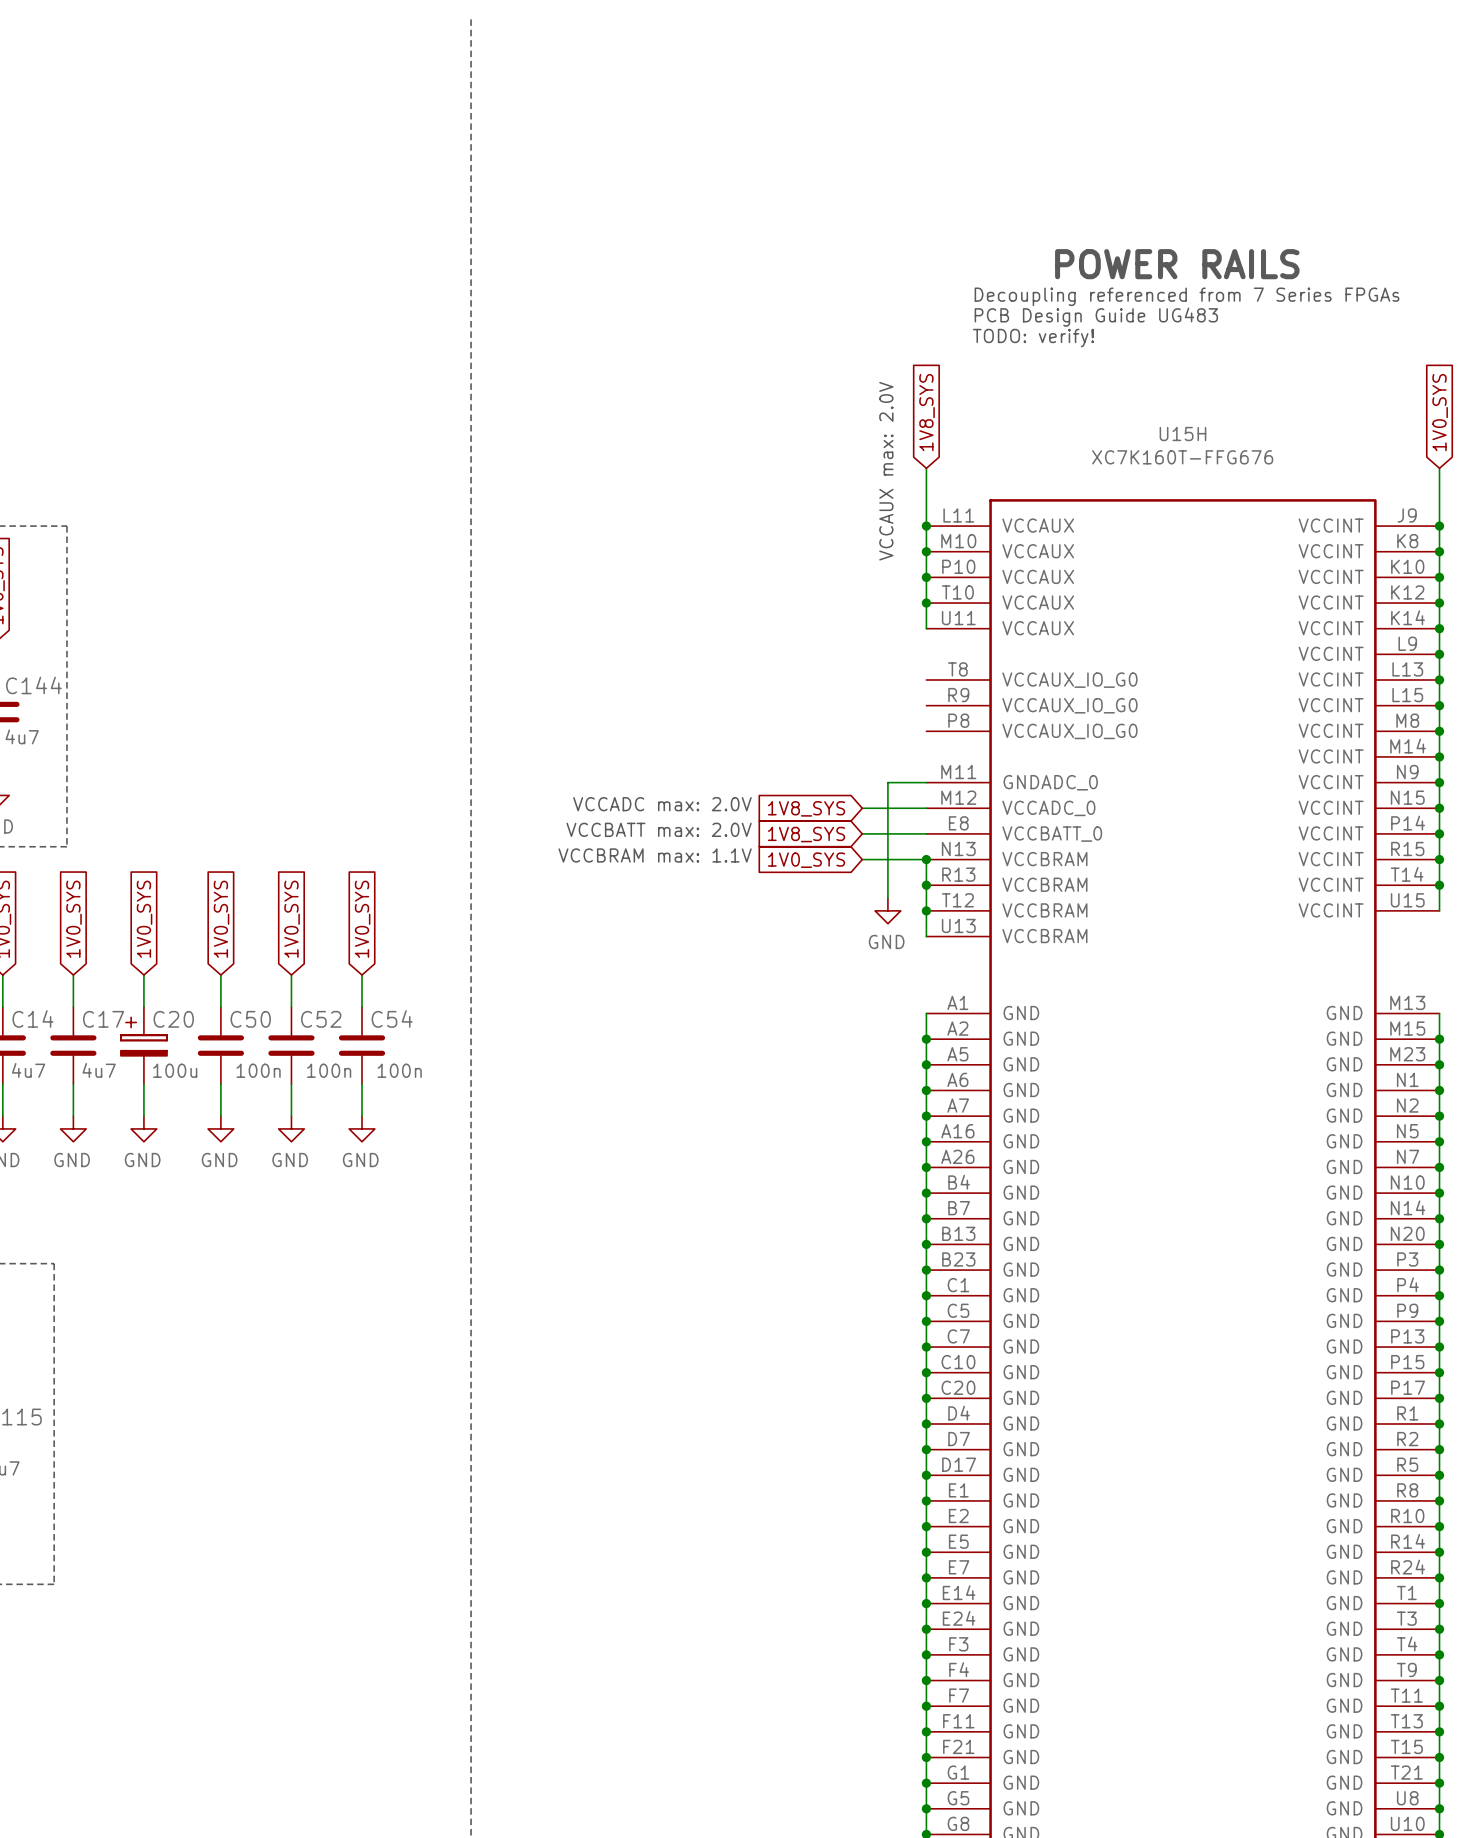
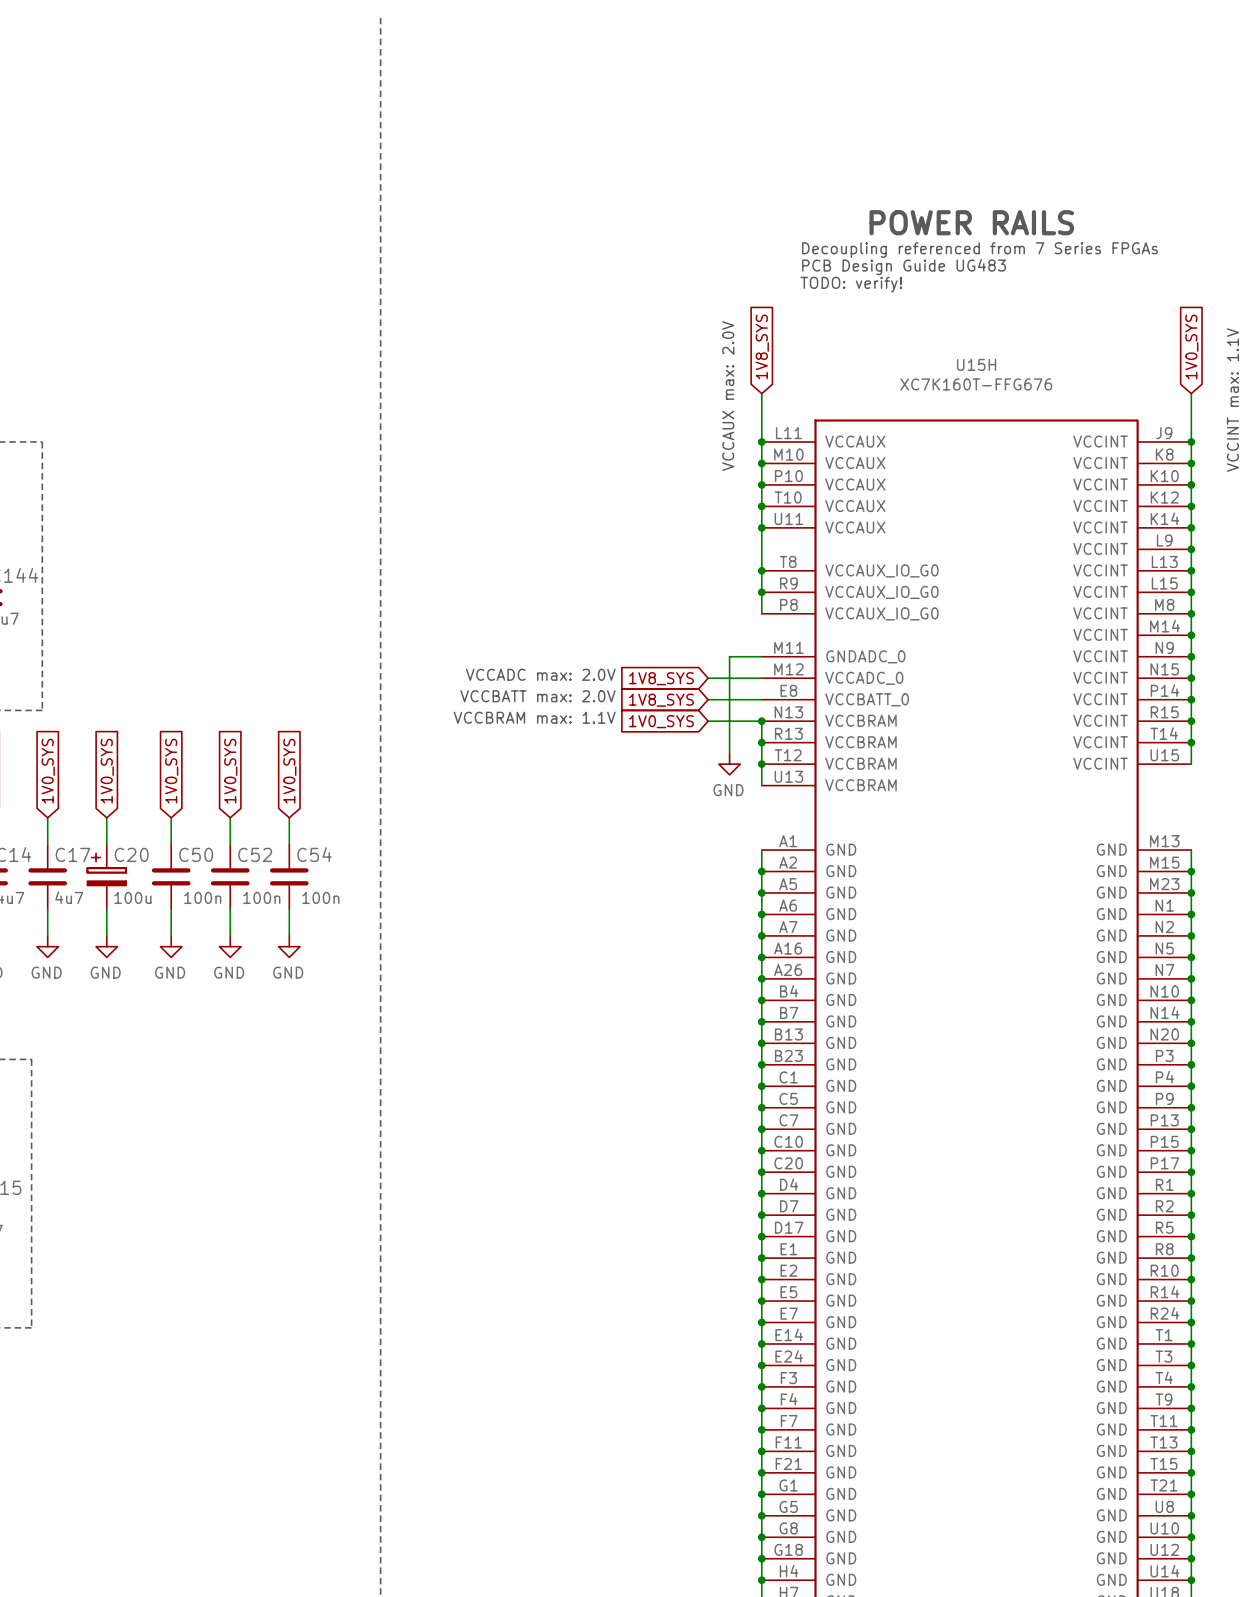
wire: none -> (761, 527) (761, 613)
junction: none -> (761, 527)
junction: none -> (761, 570)
junction: none -> (761, 592)

